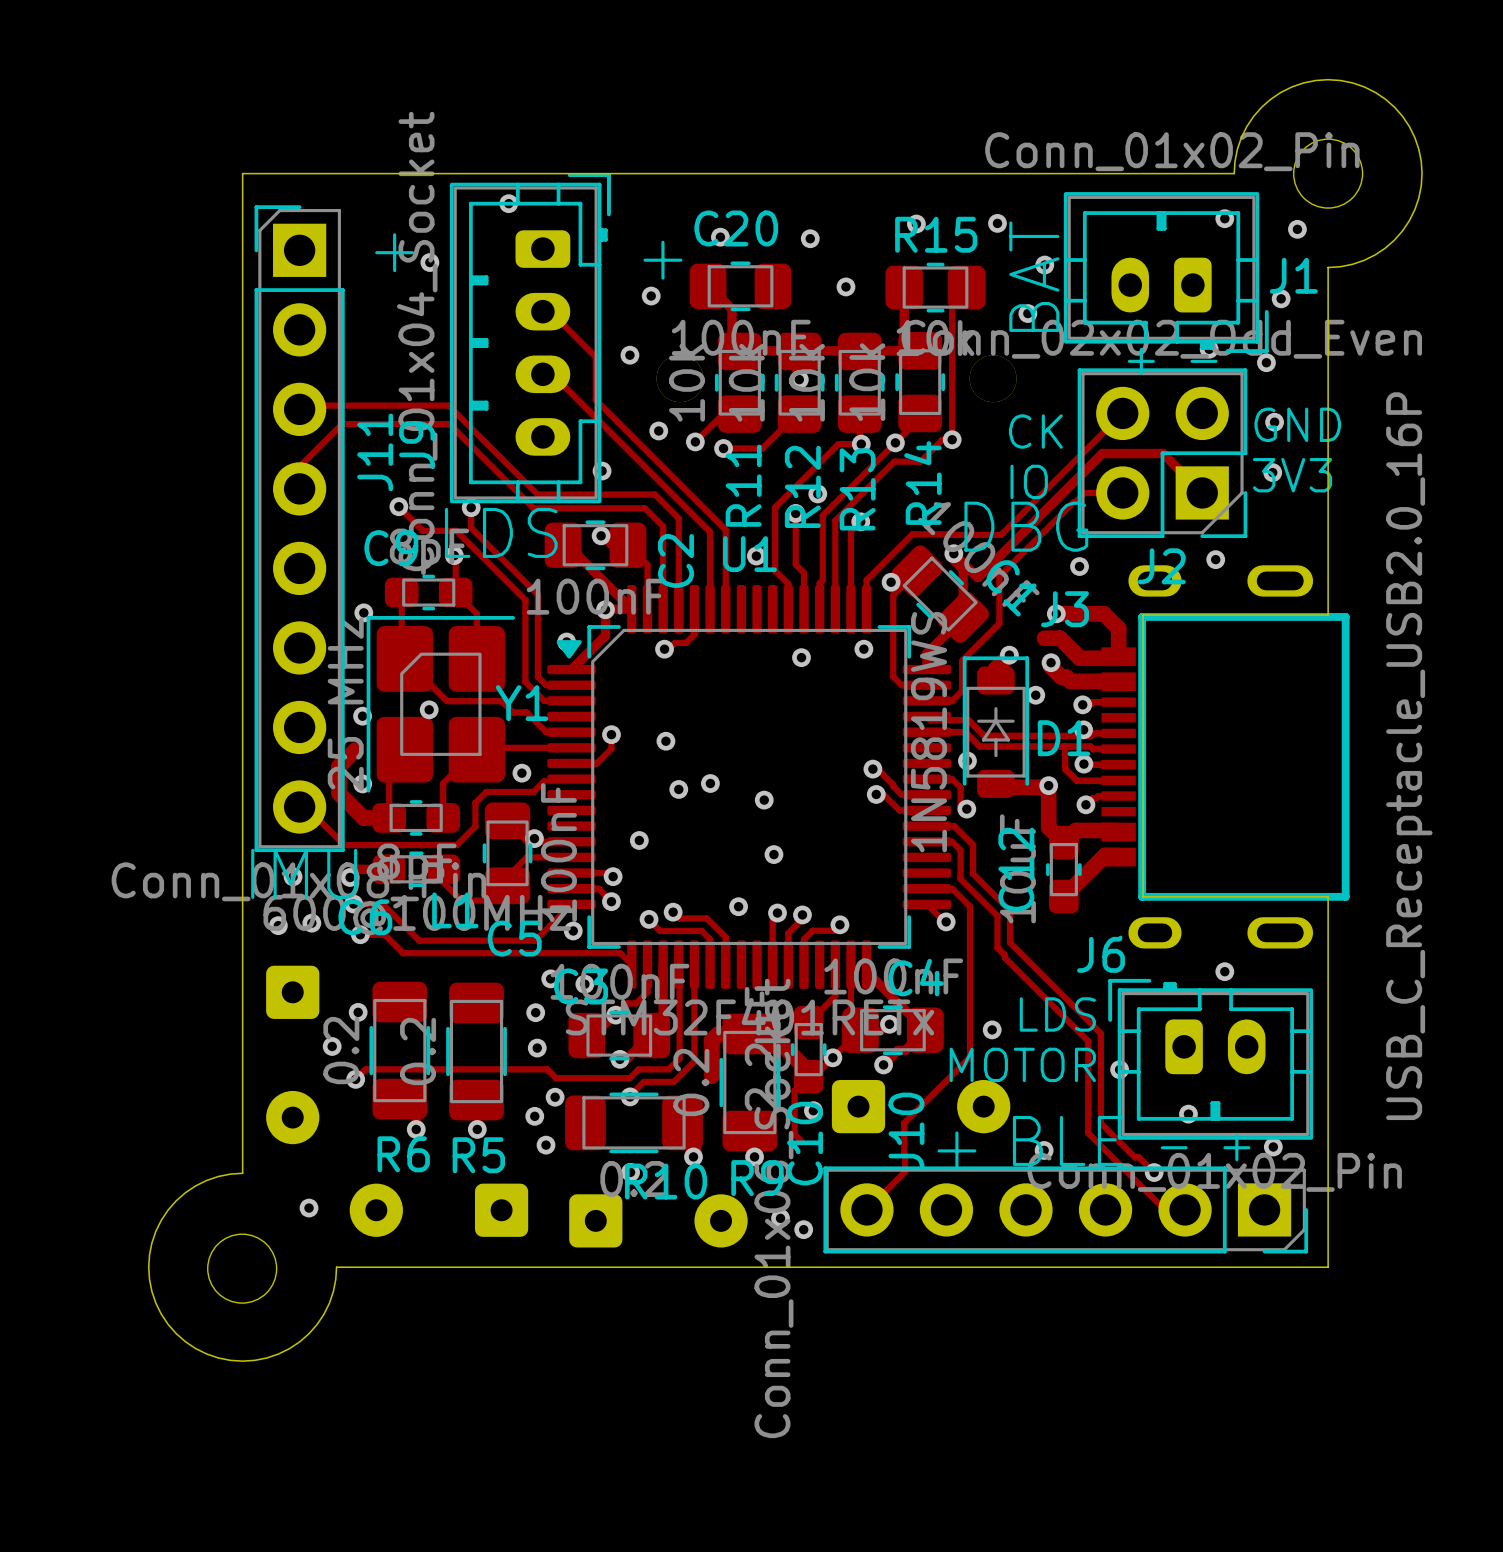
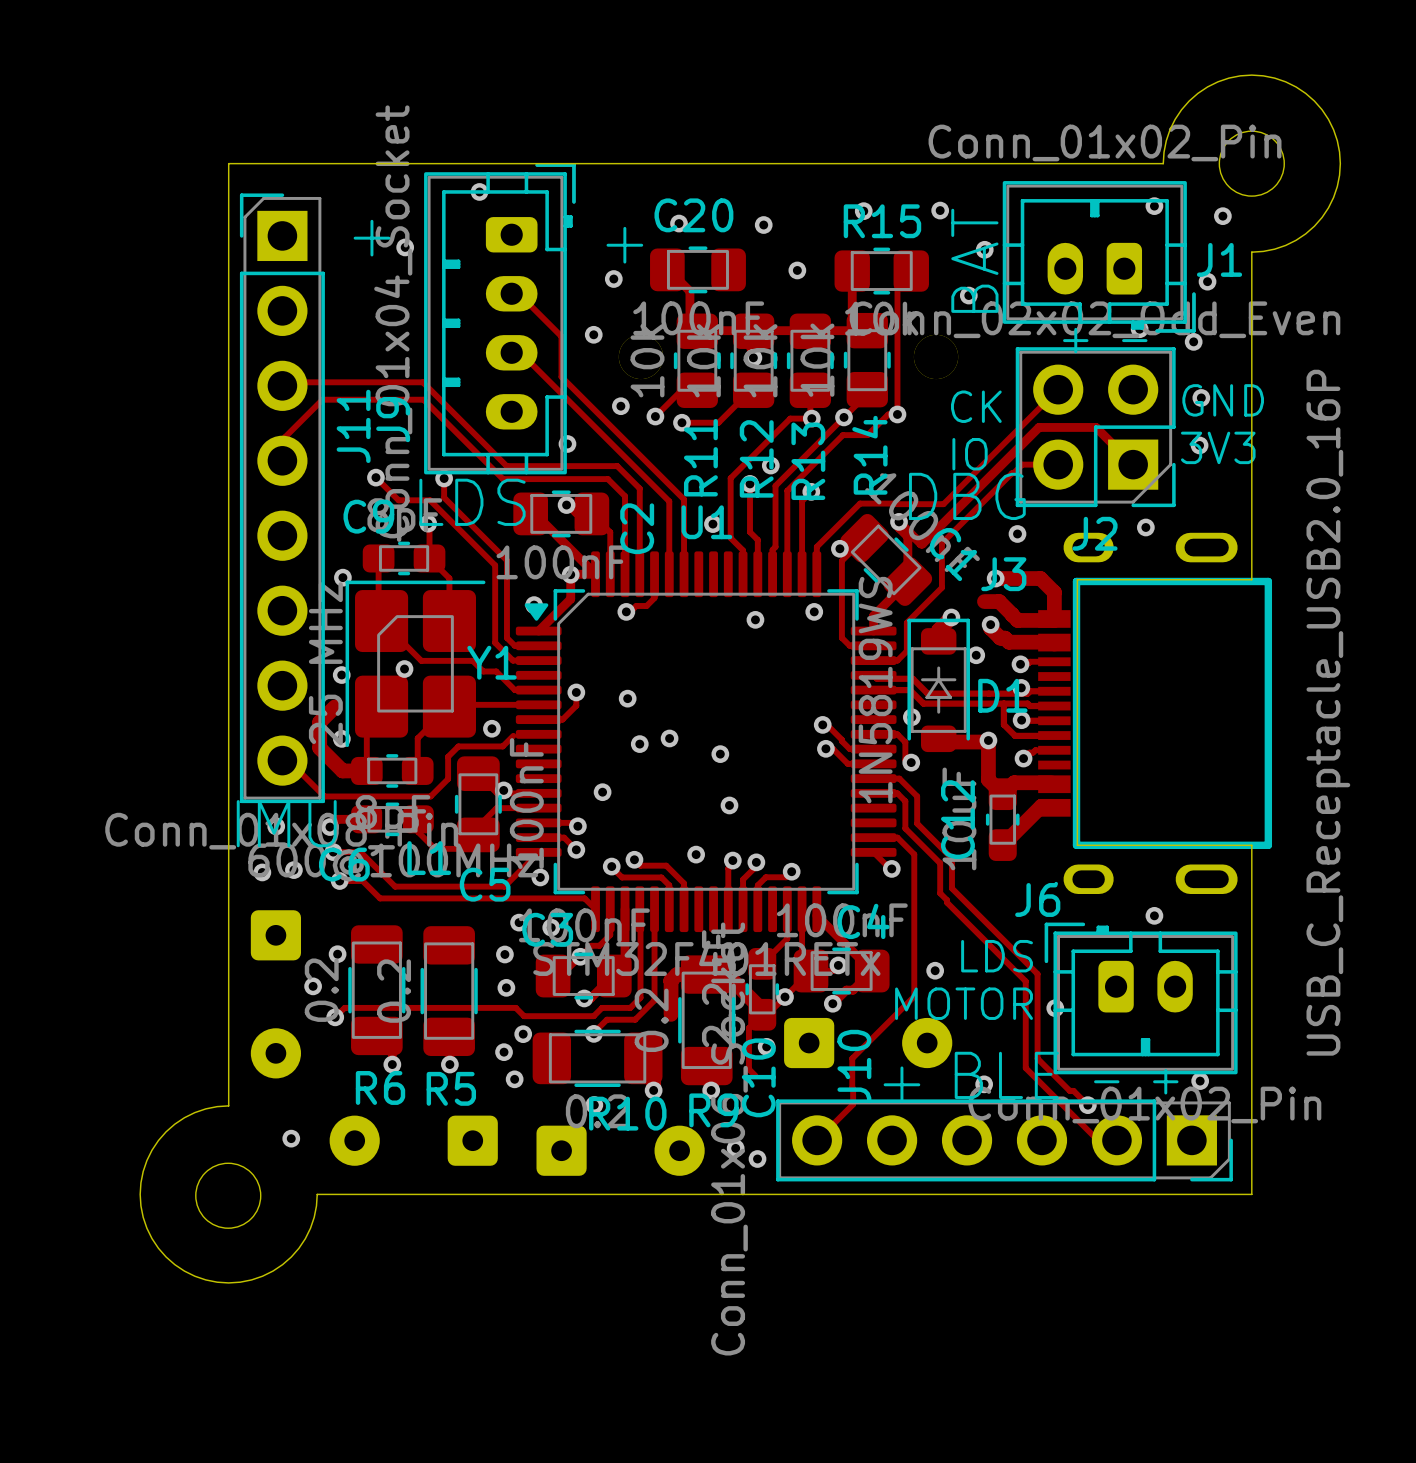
via: (1188, 1114) -> none

